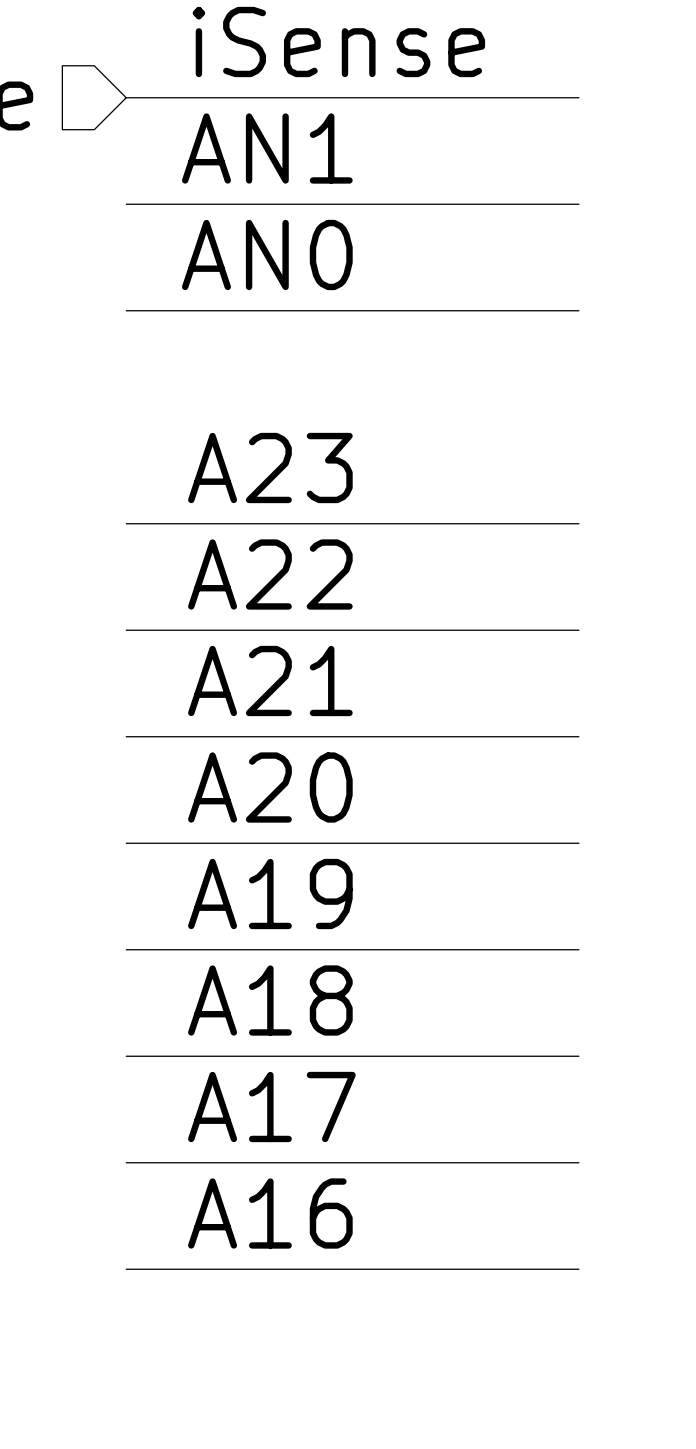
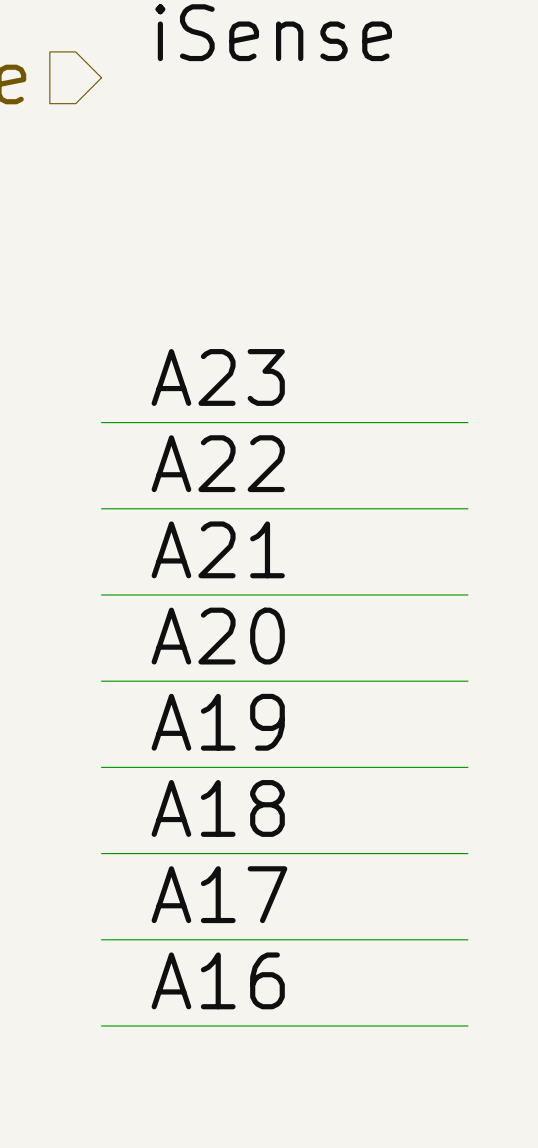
wire: (126, 97) (578, 97) -> none
label: AN1 (267, 148) -> none
wire: (126, 204) (578, 204) -> none
label: AN0 (267, 255) -> none
wire: (126, 310) (578, 310) -> none

